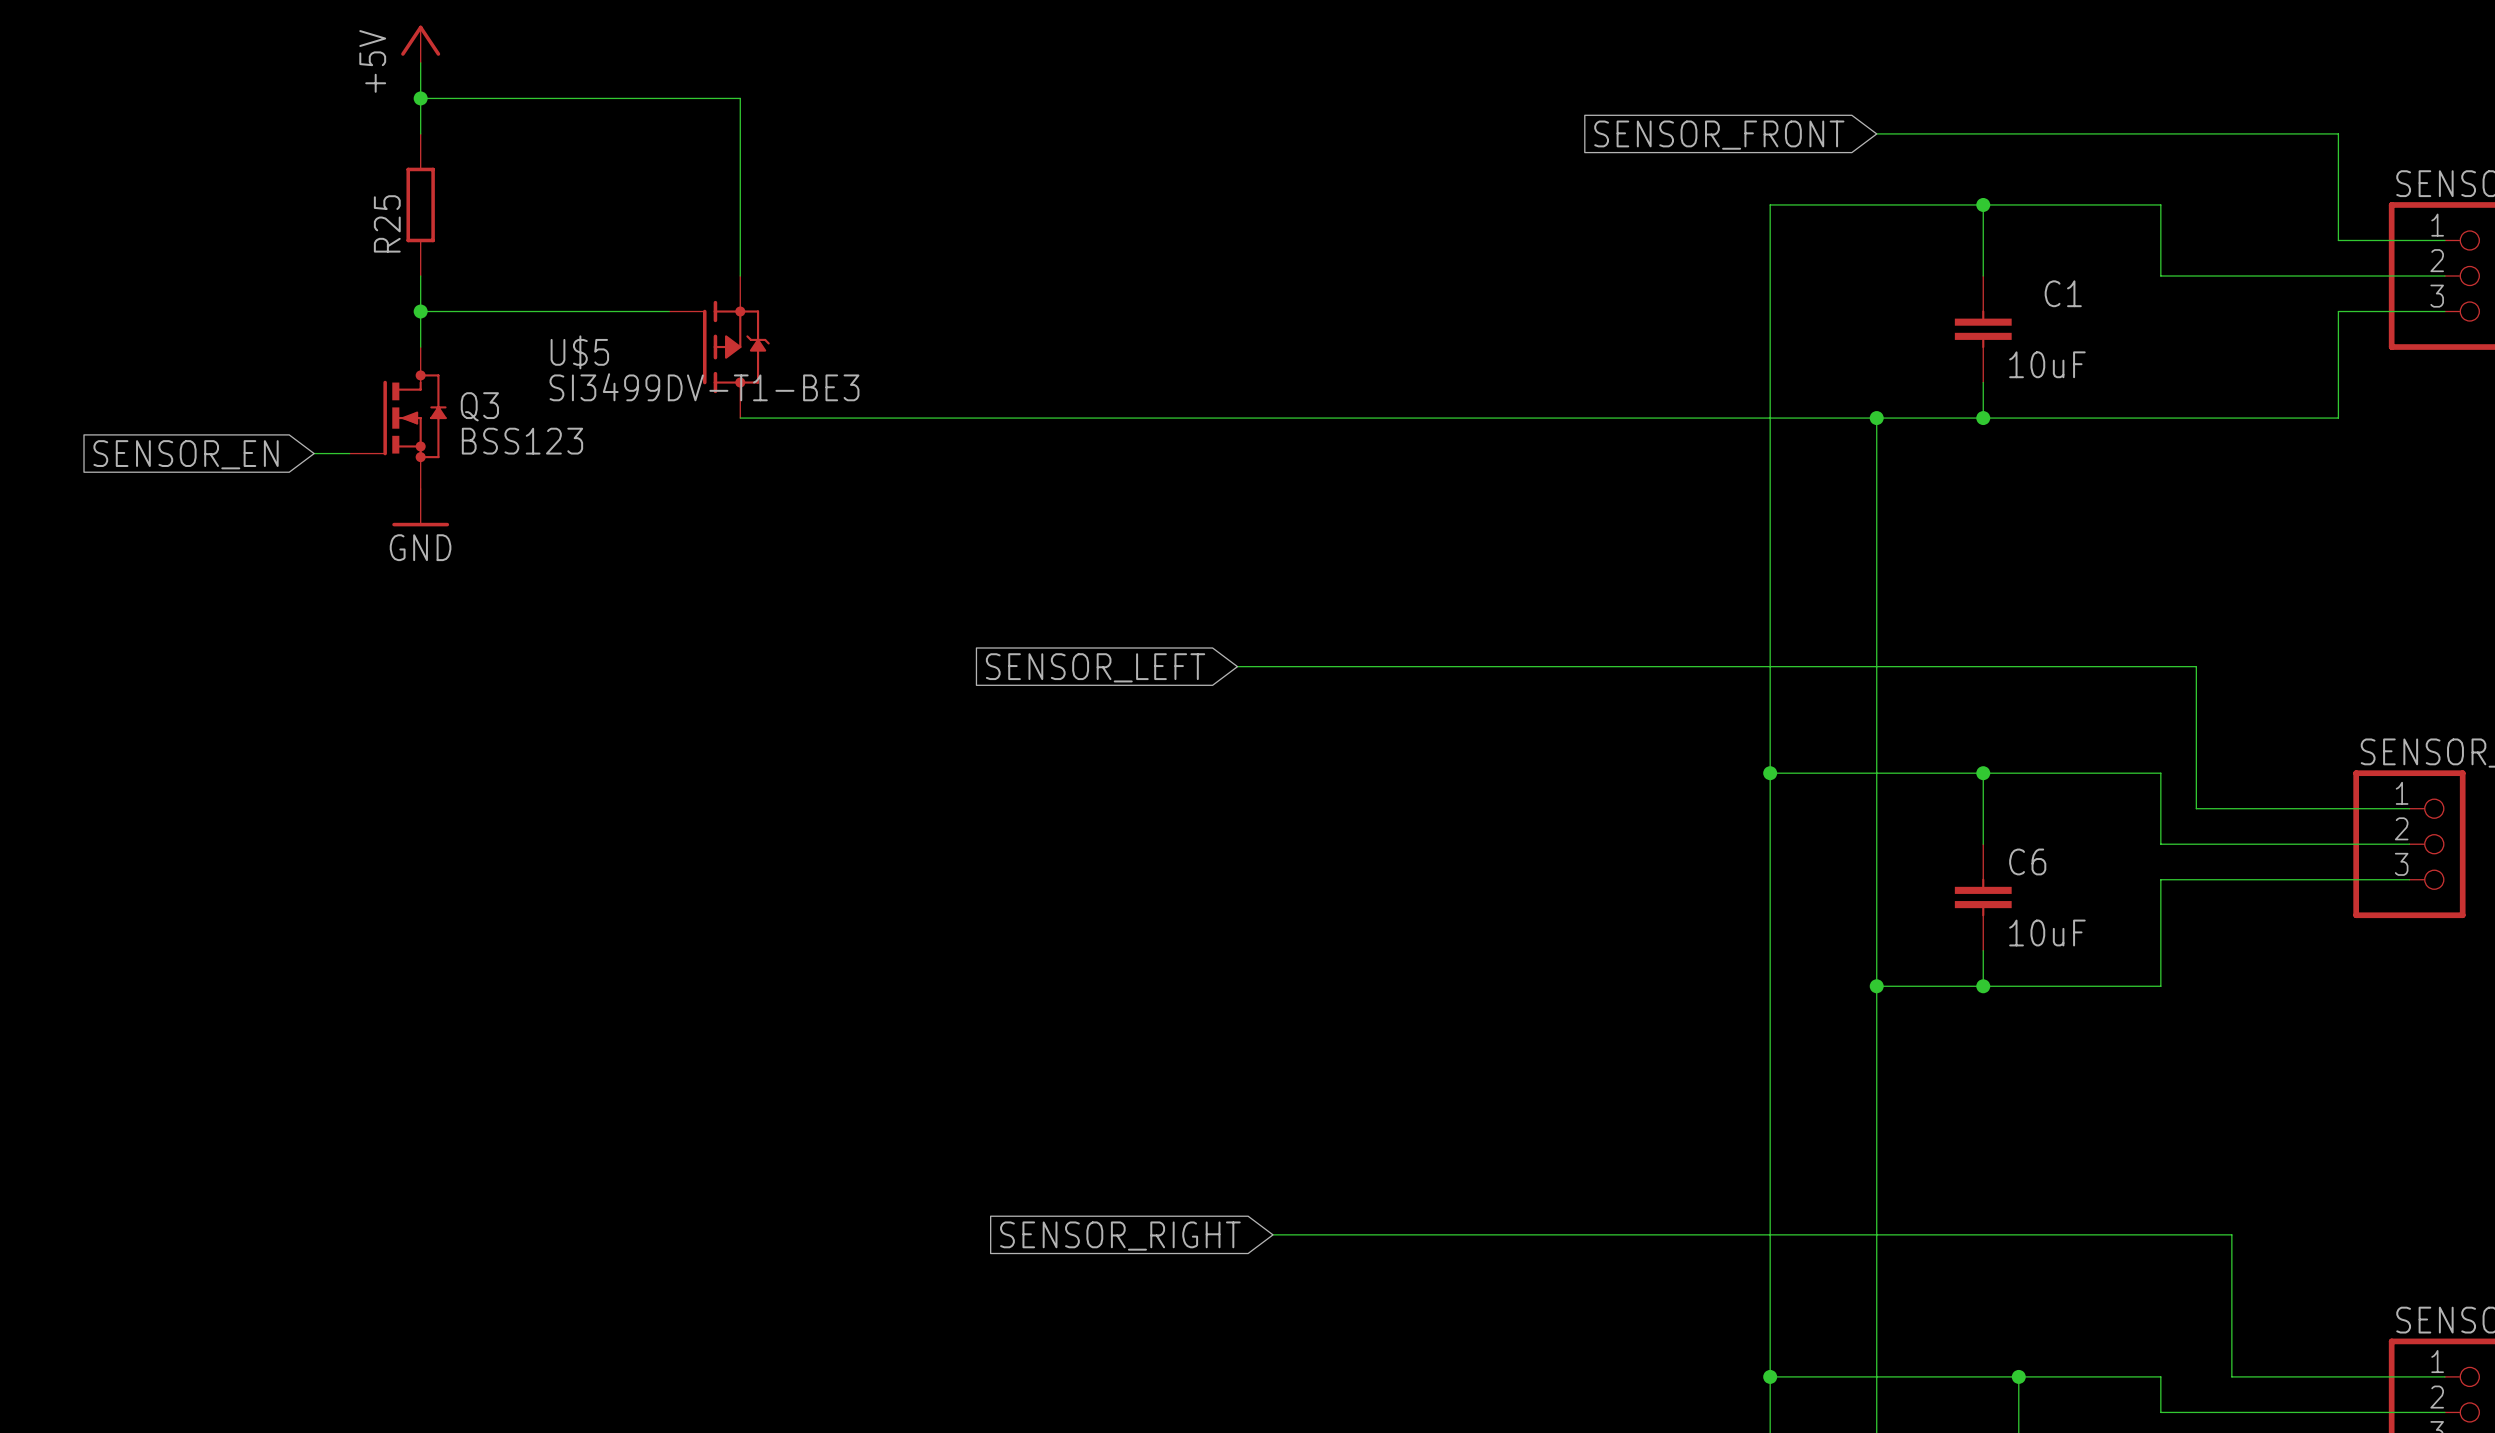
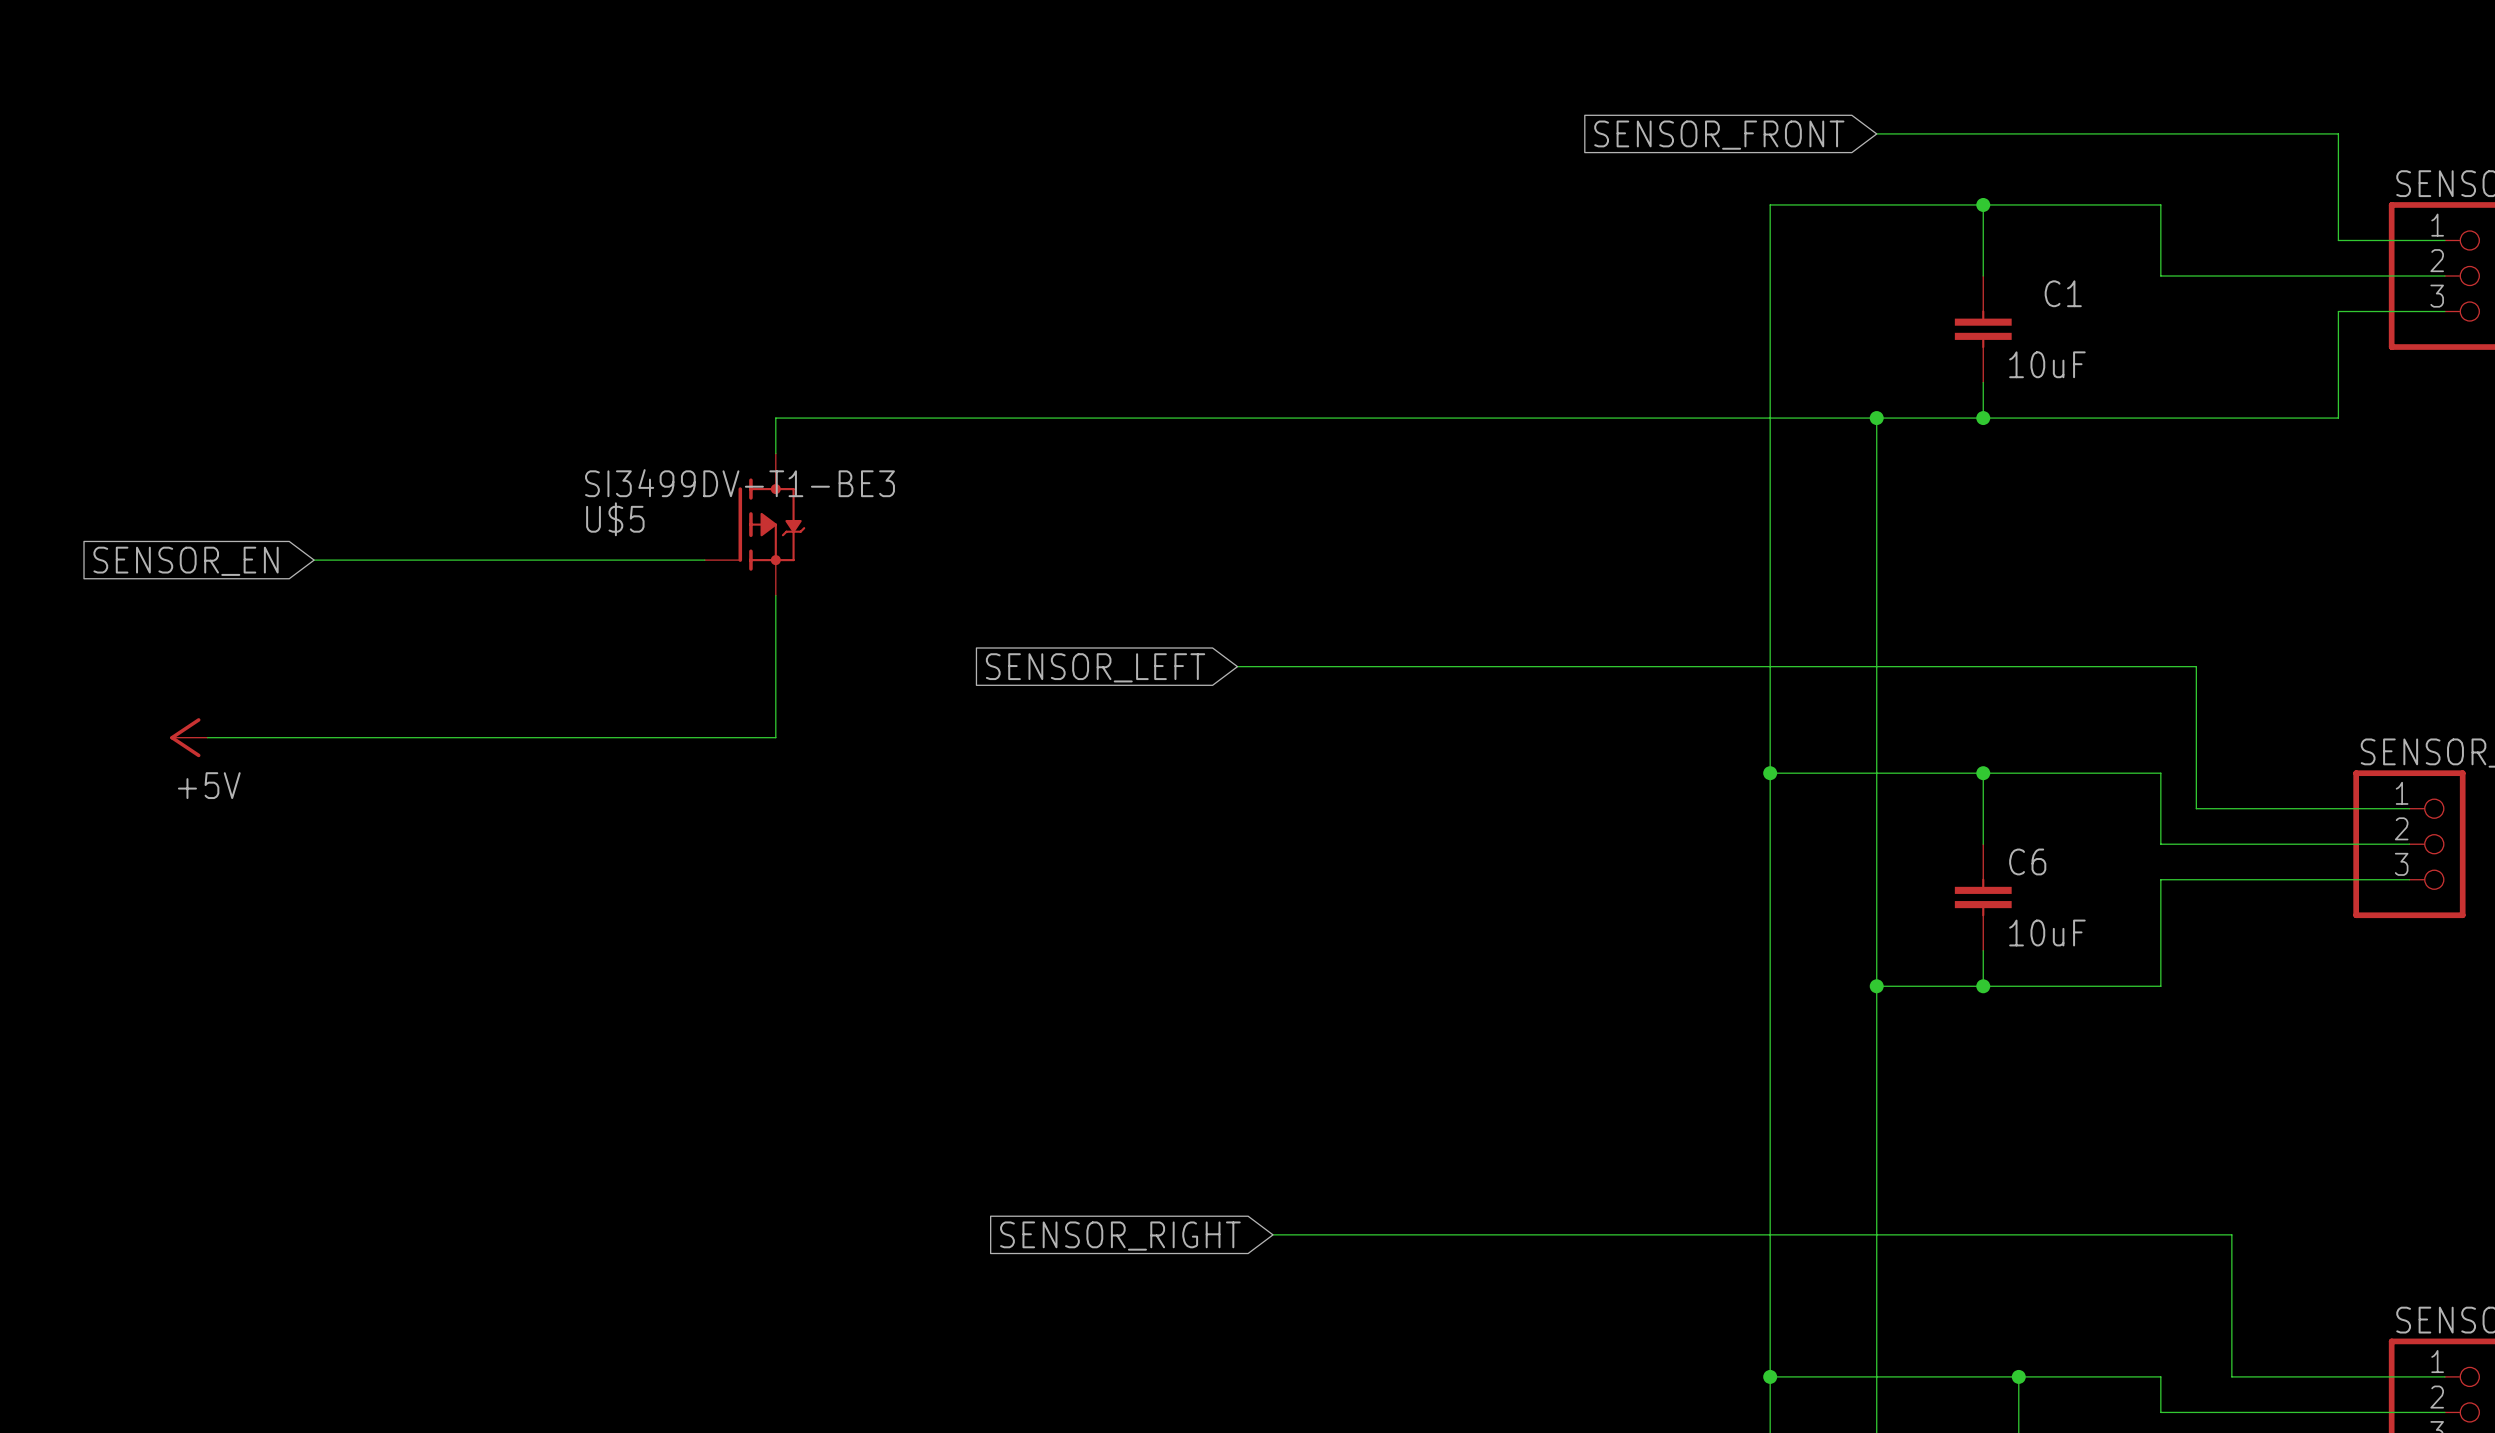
power symbol: +5V (420, 44) -> none
wire: (420, 62) (420, 133) -> none
wire: (420, 98) (740, 98) (740, 276) -> none
junction: (420, 98) -> none
R25: (420, 204) -> none
wire: (420, 276) (420, 347) -> none
wire: (420, 311) (669, 311) -> none
junction: (420, 311) -> none
U$5 position: (719, 347) -> (755, 524)
U$5 flip: as is (736, 347) -> up-down (771, 524)
Q3: BSS123 (398, 418) -> none
wire: (740, 418) (775, 418) -> (775, 453) (775, 418)
wire: (314, 453) (349, 453) -> none
global label position: SENSOR_EN (186, 454) -> SENSOR_EN (186, 561)
power symbol: GND (420, 507) -> none
wire: none -> (314, 560) (704, 560)
wire: none -> (775, 595) (775, 737) (207, 737)
power symbol: none -> +5V (188, 737)

